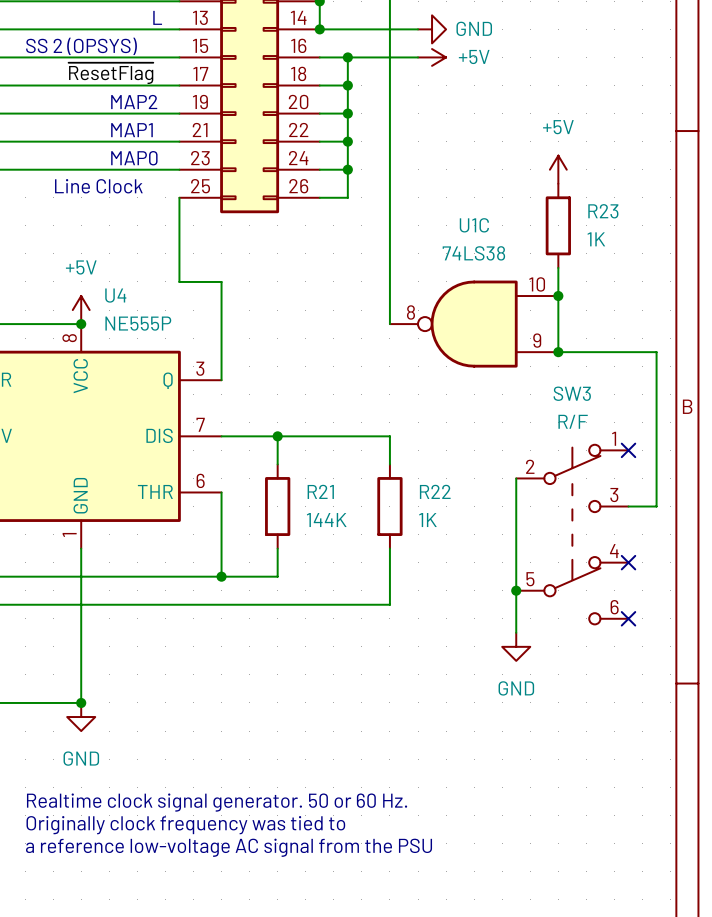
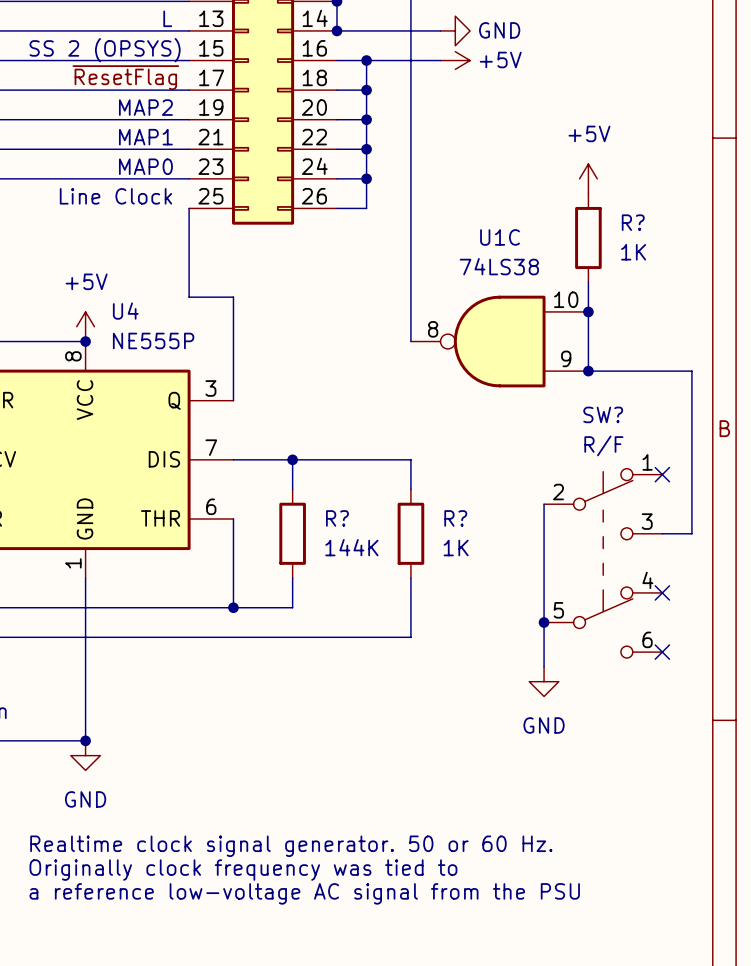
R23 name: R23 (603, 211) -> R? (633, 222)
SW3 name: SW3 (572, 393) -> SW? (603, 414)
R21 name: R21 (320, 491) -> R? (337, 518)
R22 name: R22 (435, 491) -> R? (455, 518)

